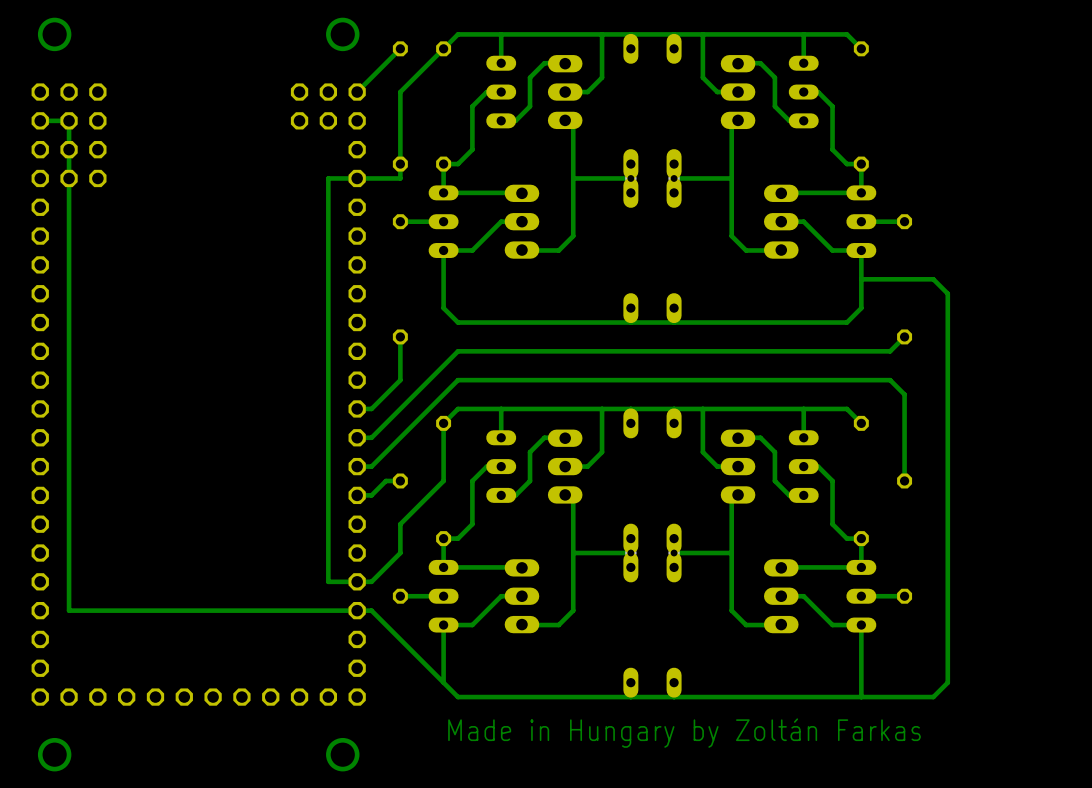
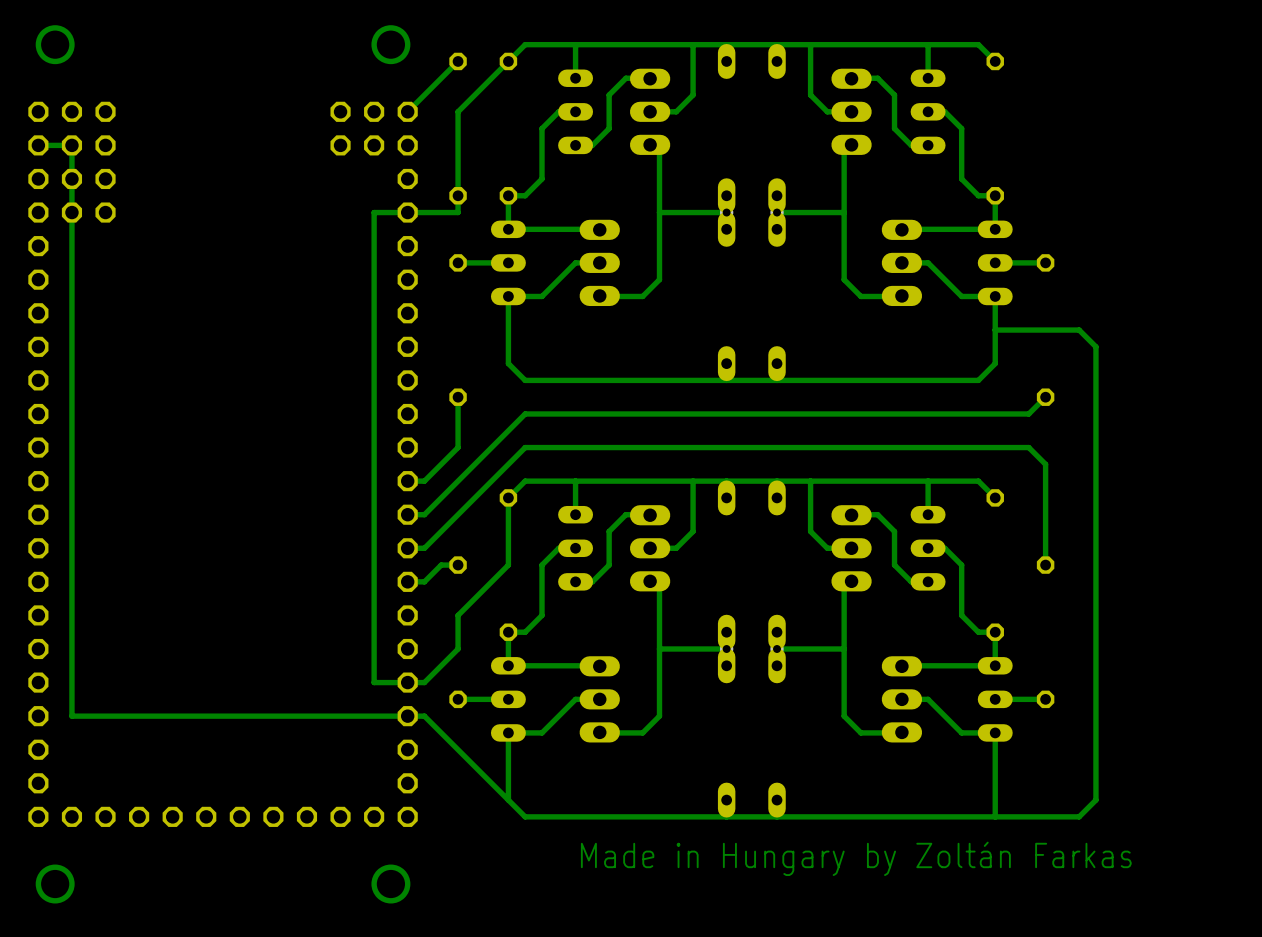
text position: Made in Hungary by Zoltán Farkas (684, 733) -> Made in Hungary by Zoltán Farkas (856, 858)

